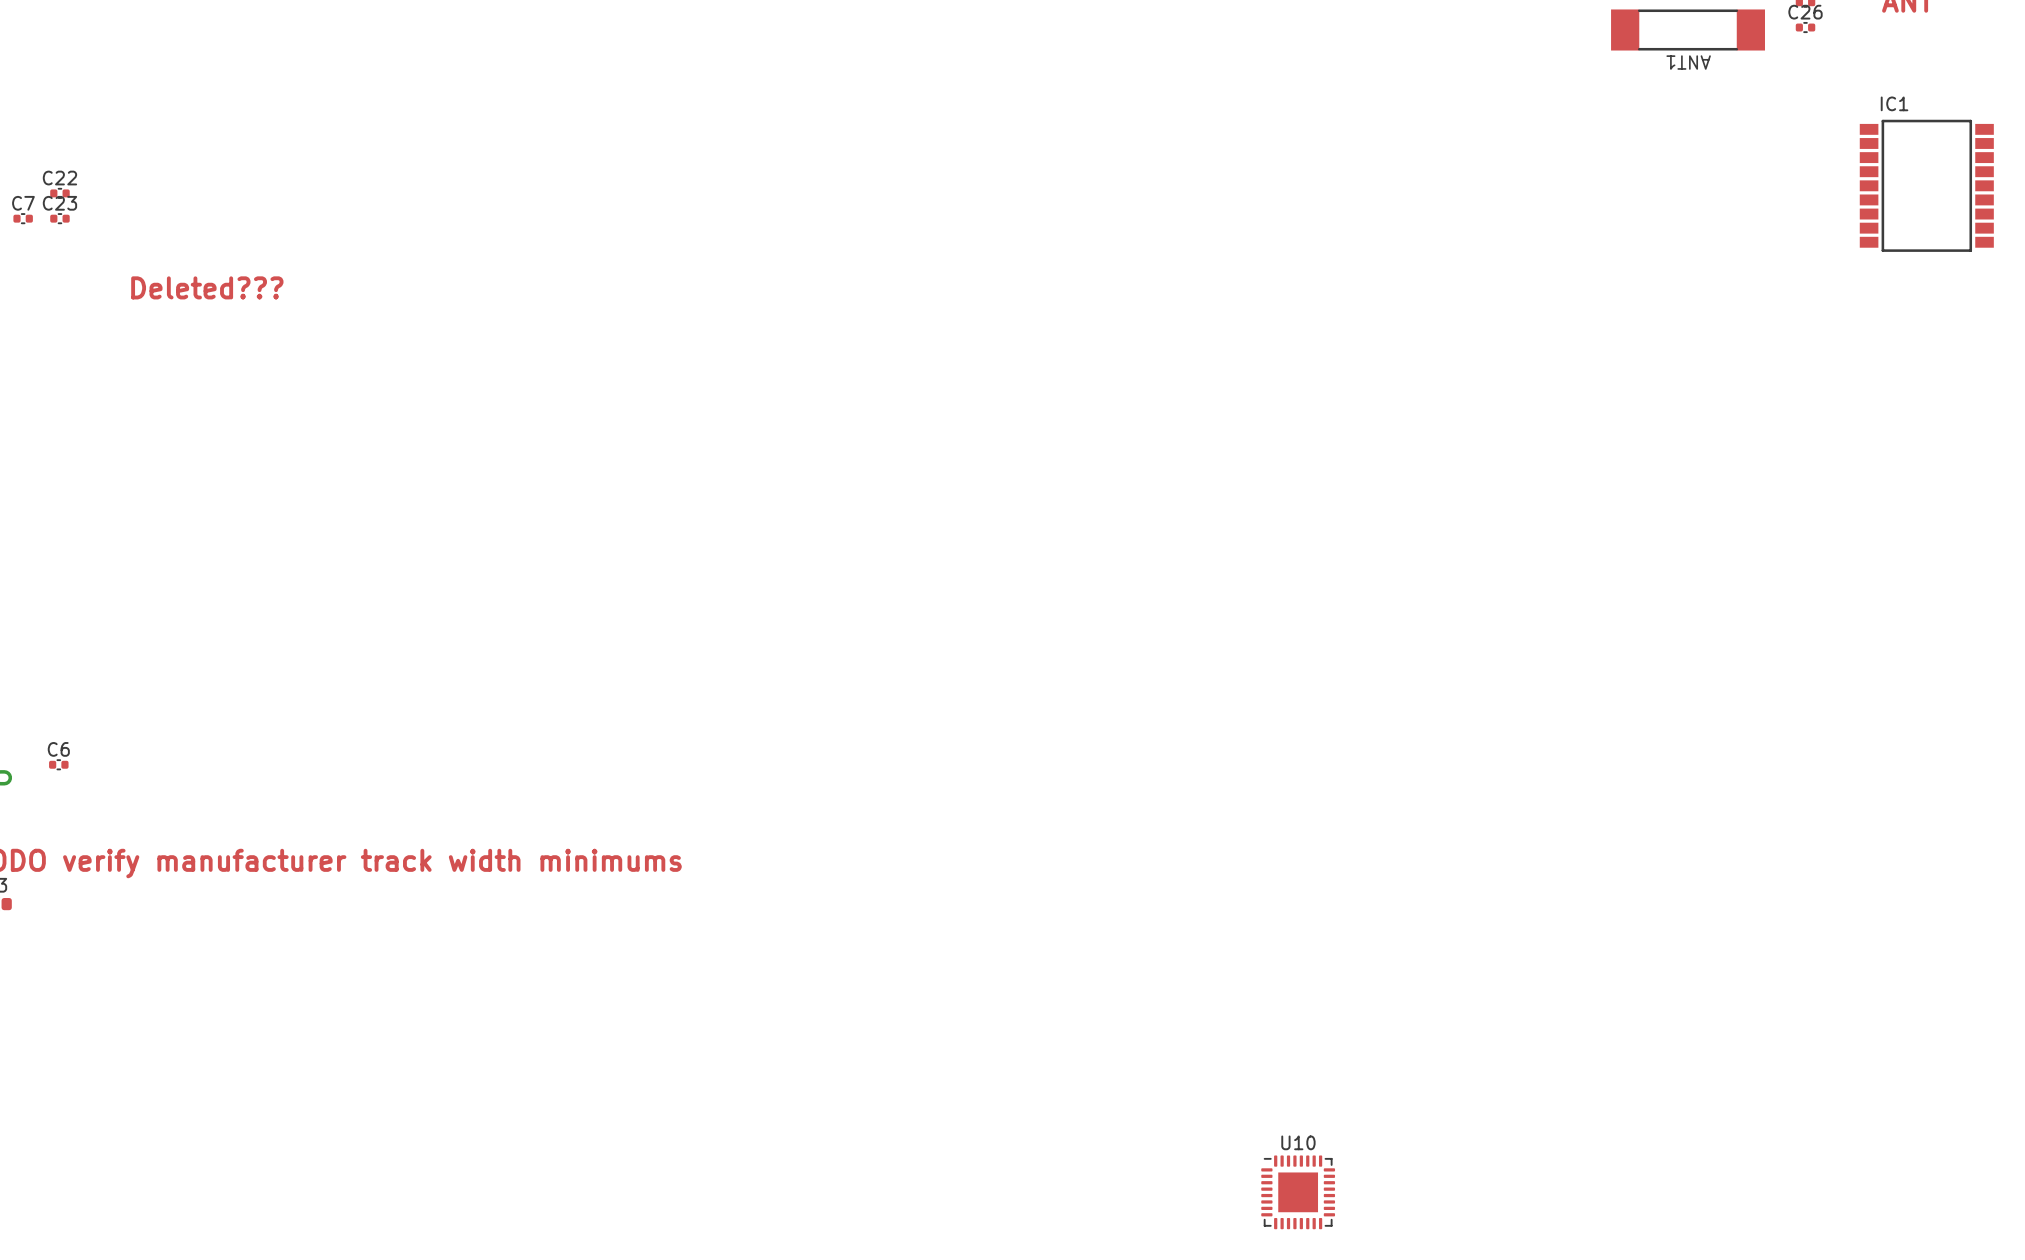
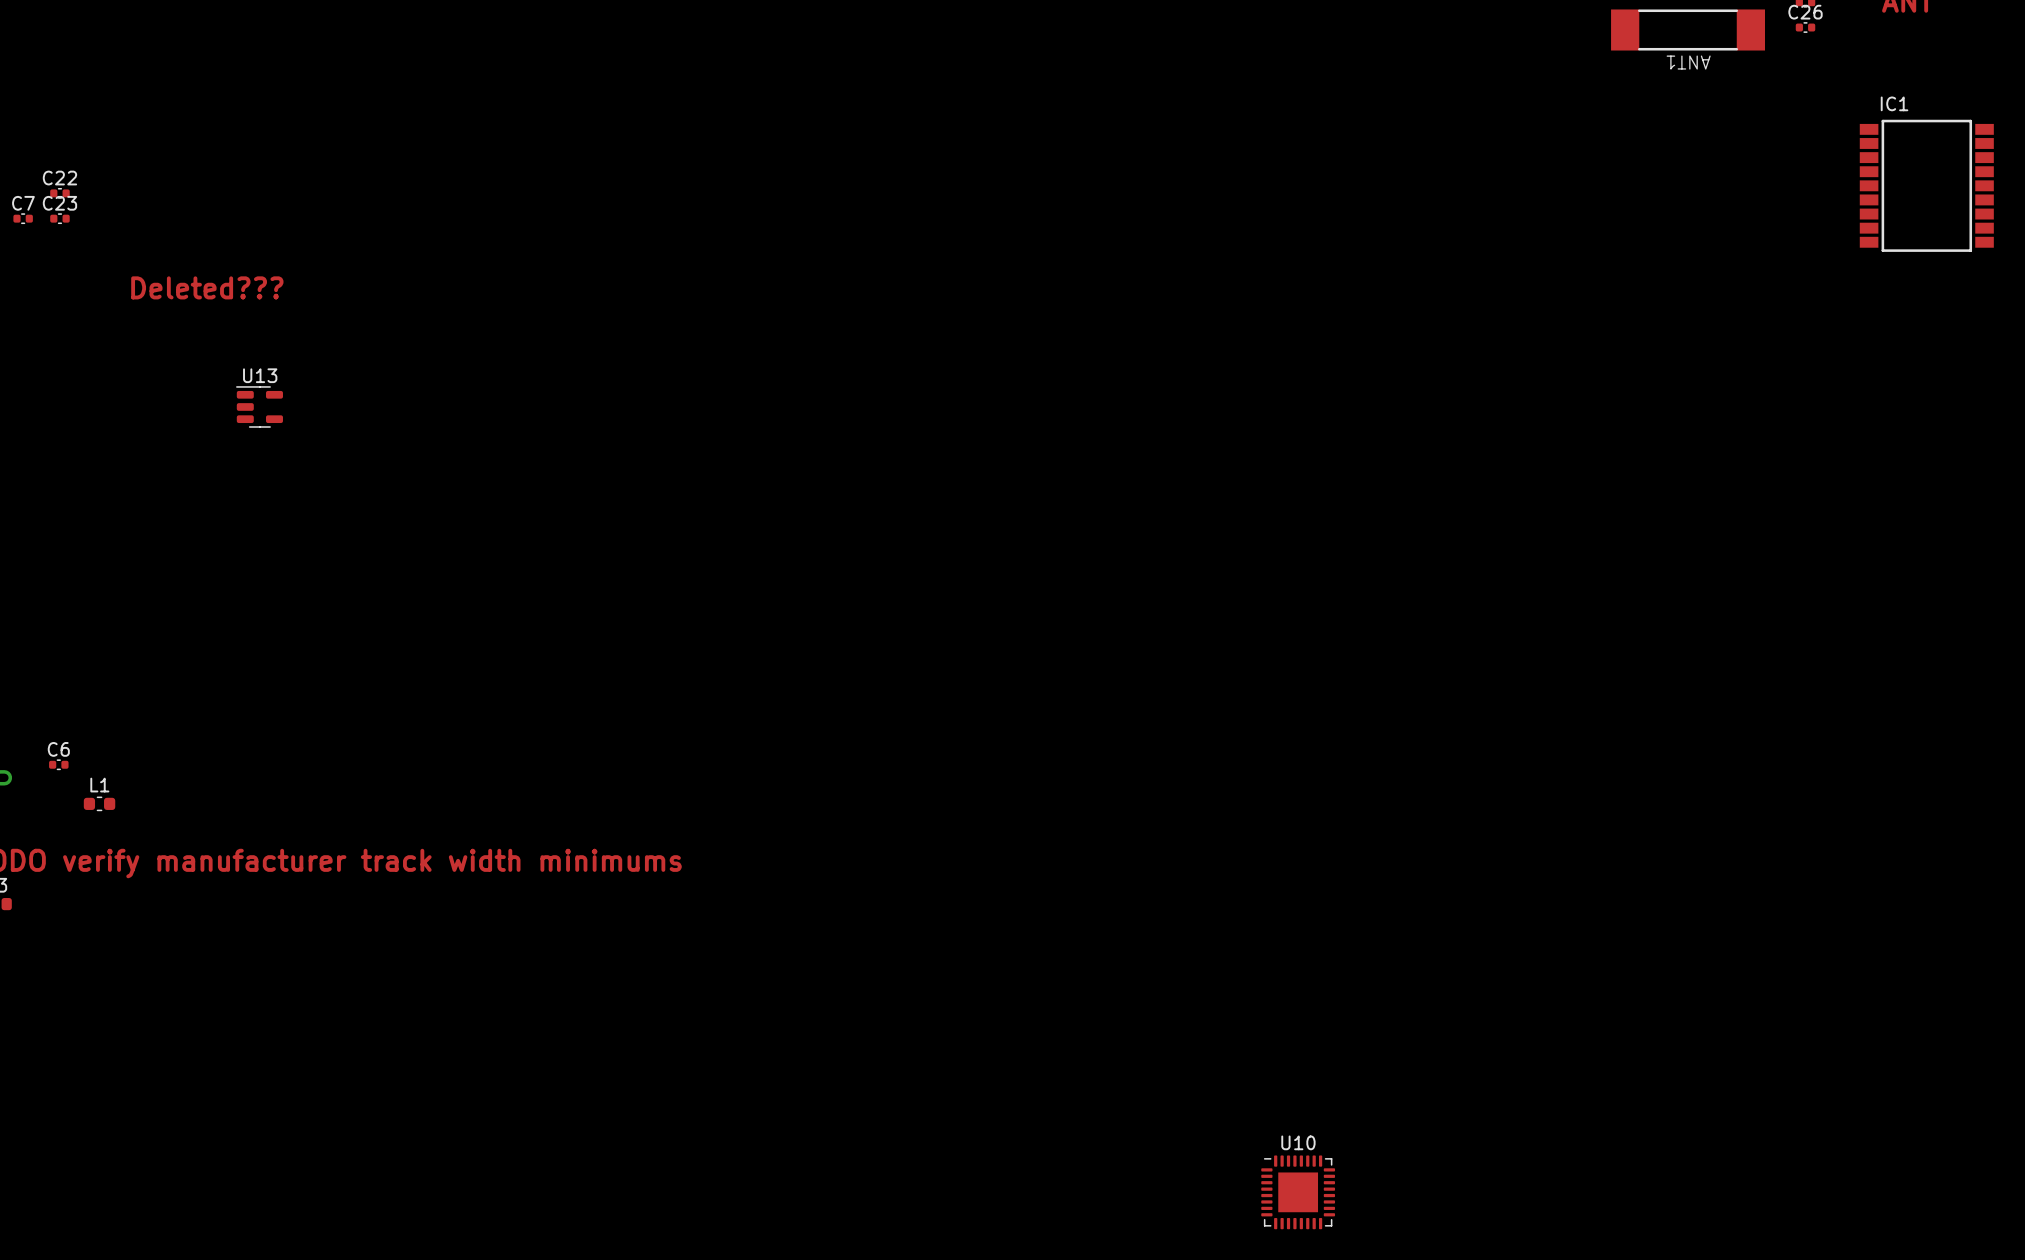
U13: none -> (259, 406)
L1: none -> (99, 803)

